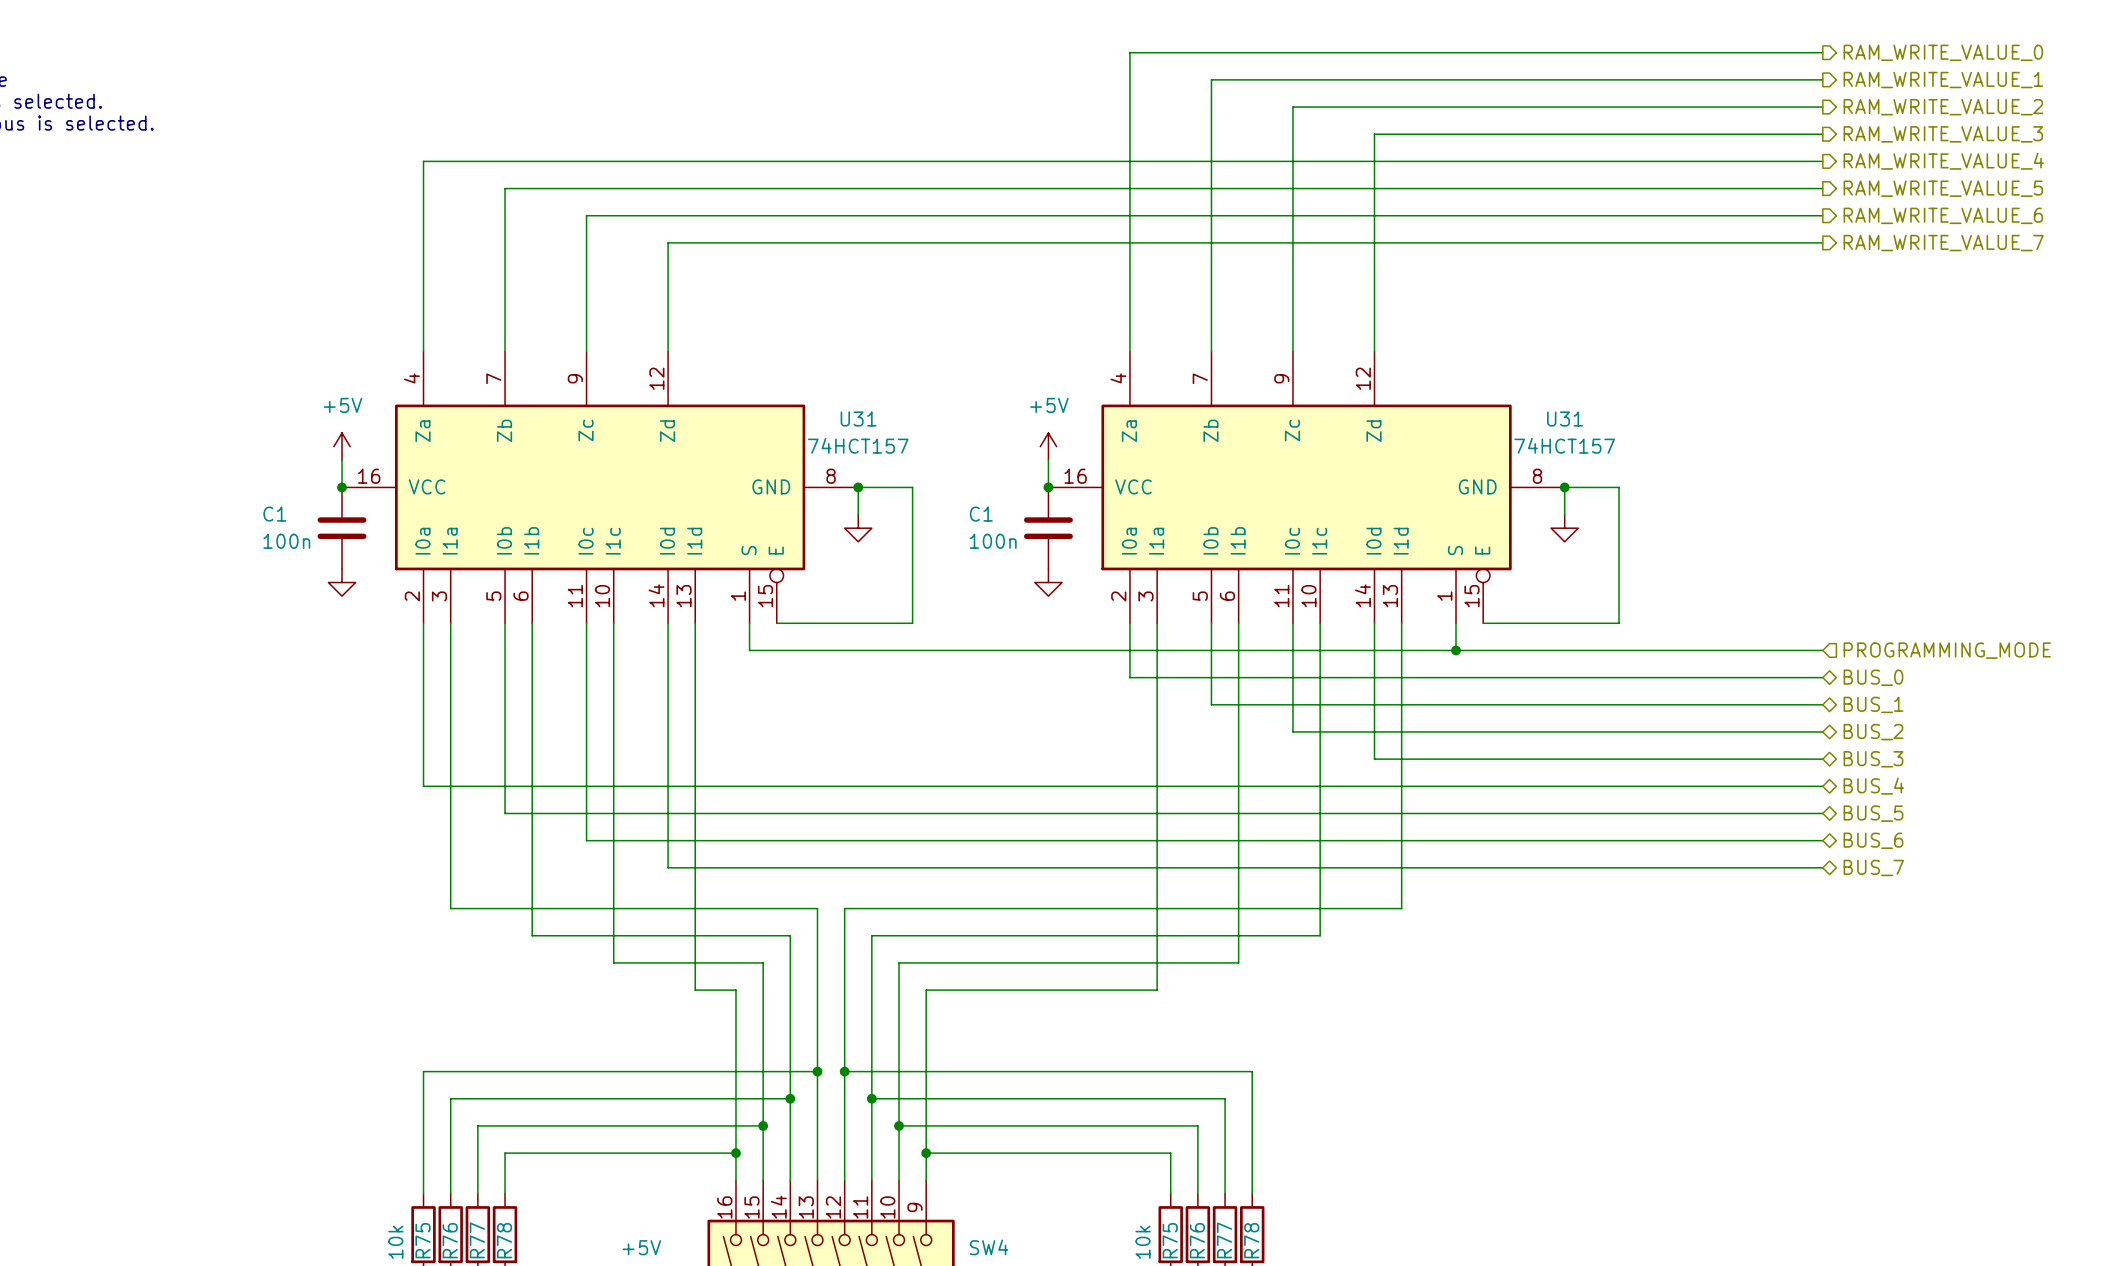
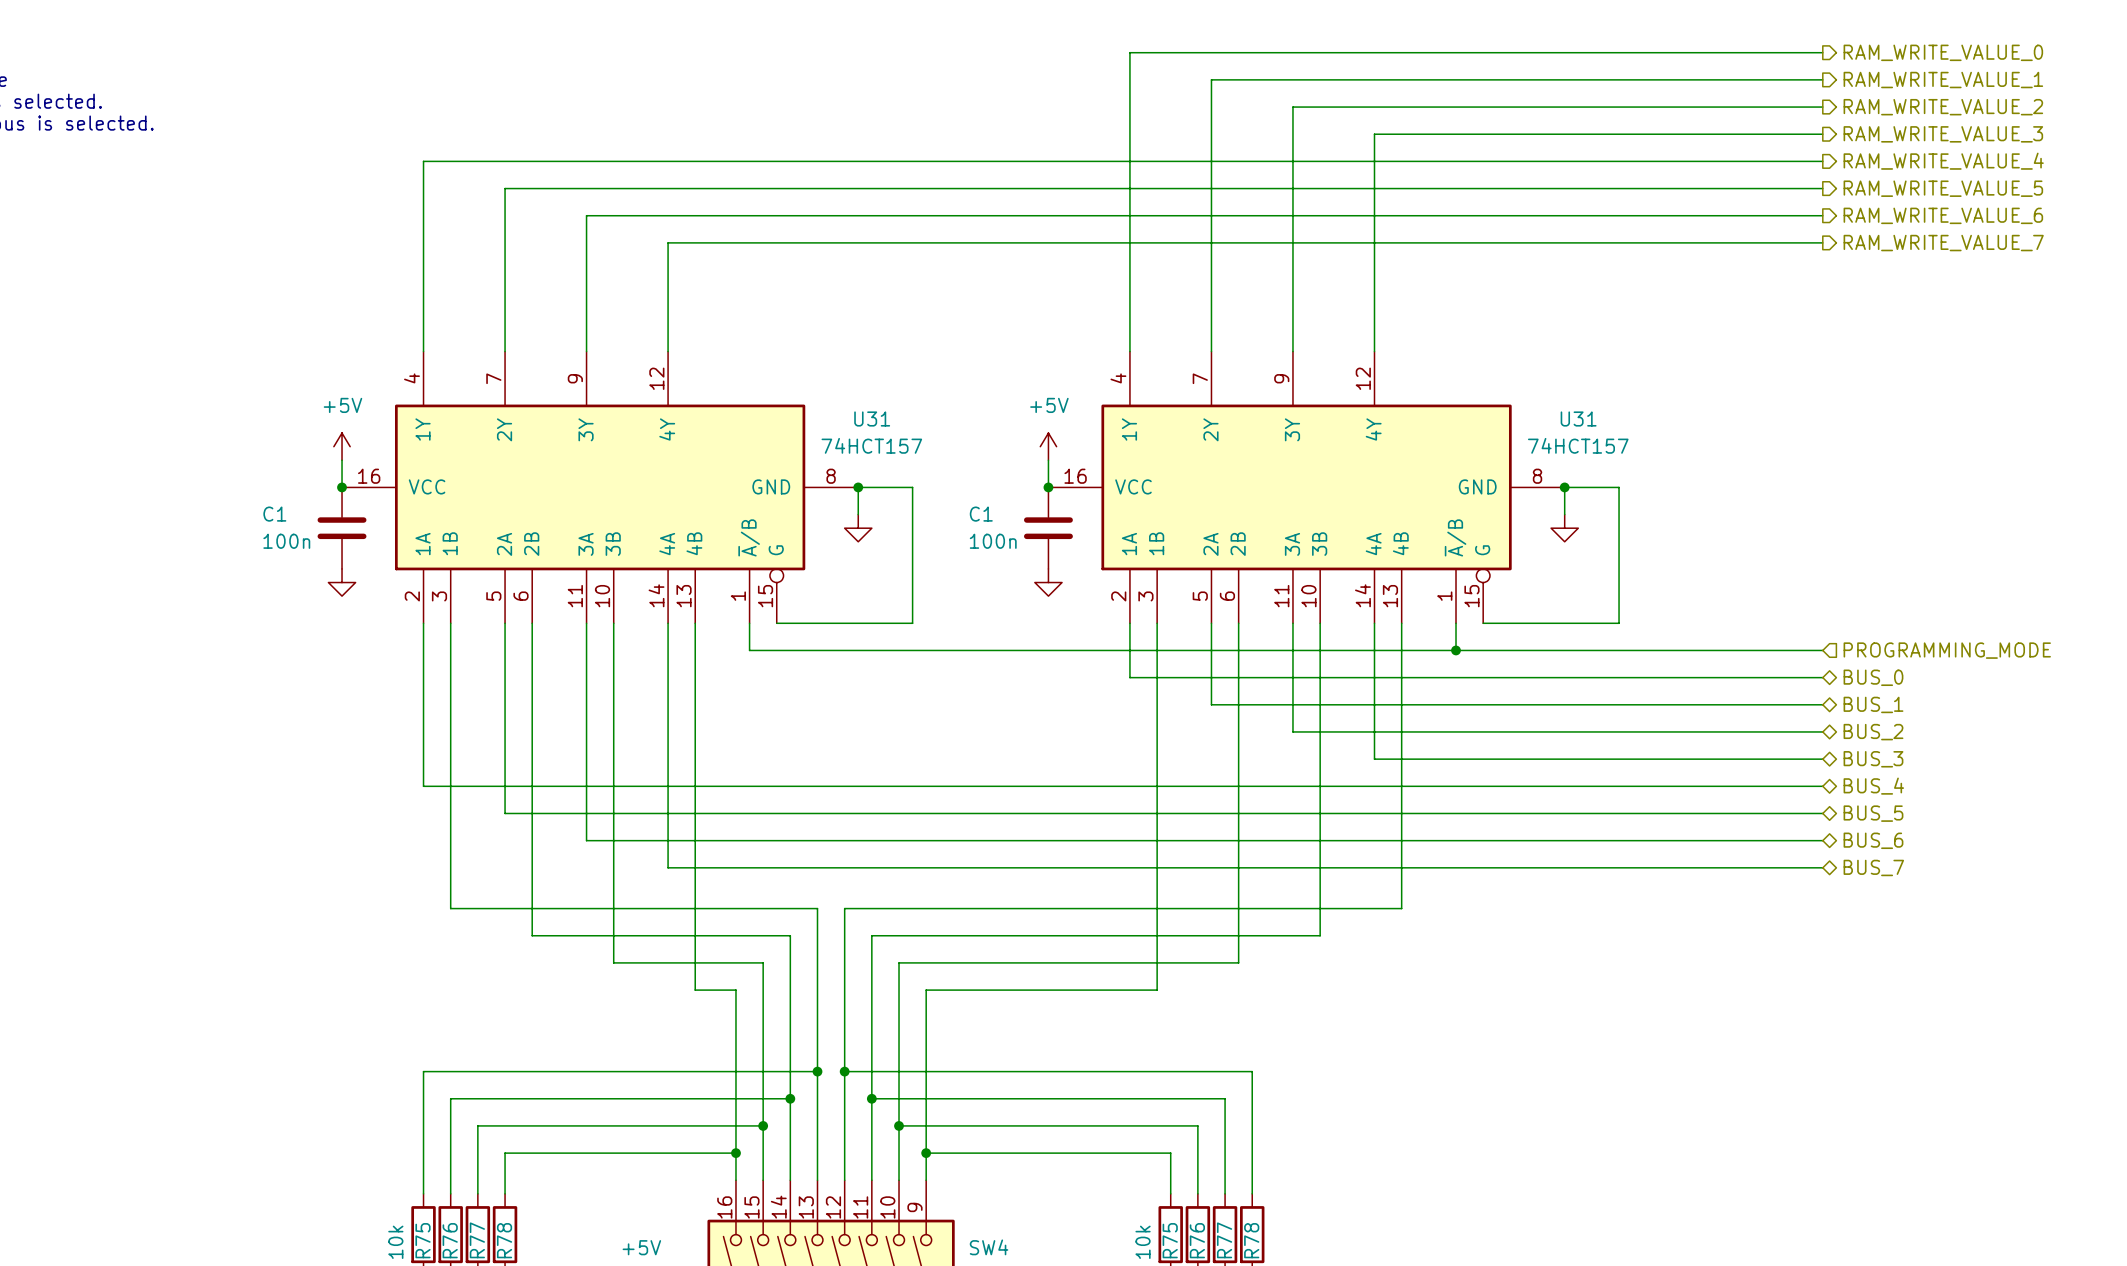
U31 symbol: [342, 351, 859, 624] -> [342, 351, 859, 624]
U31 symbol: [1048, 351, 1565, 624] -> [1048, 351, 1565, 624]

